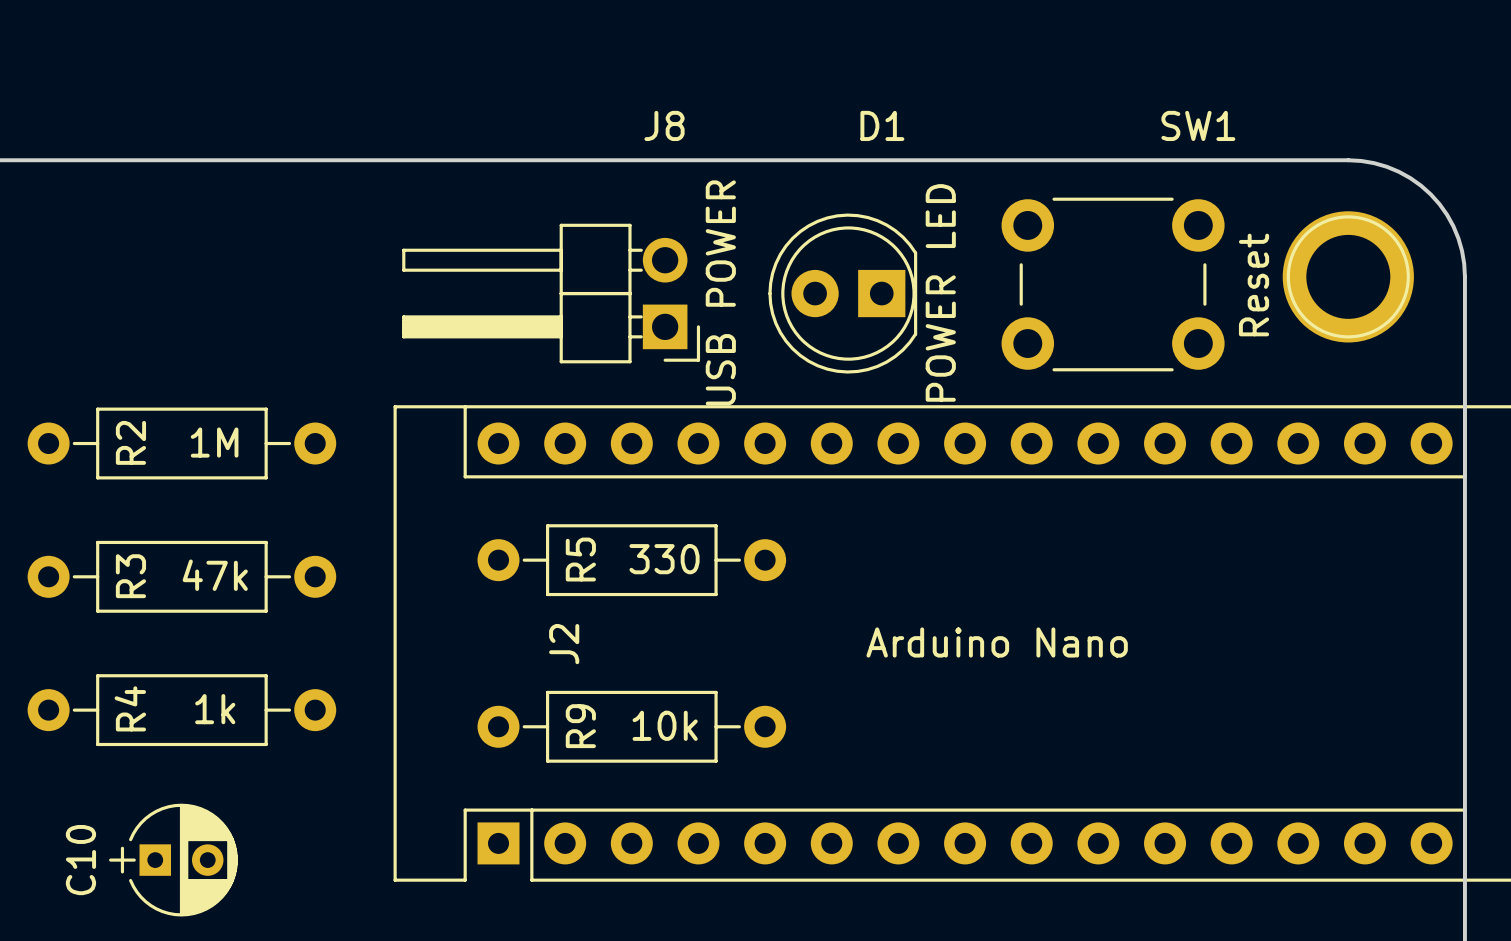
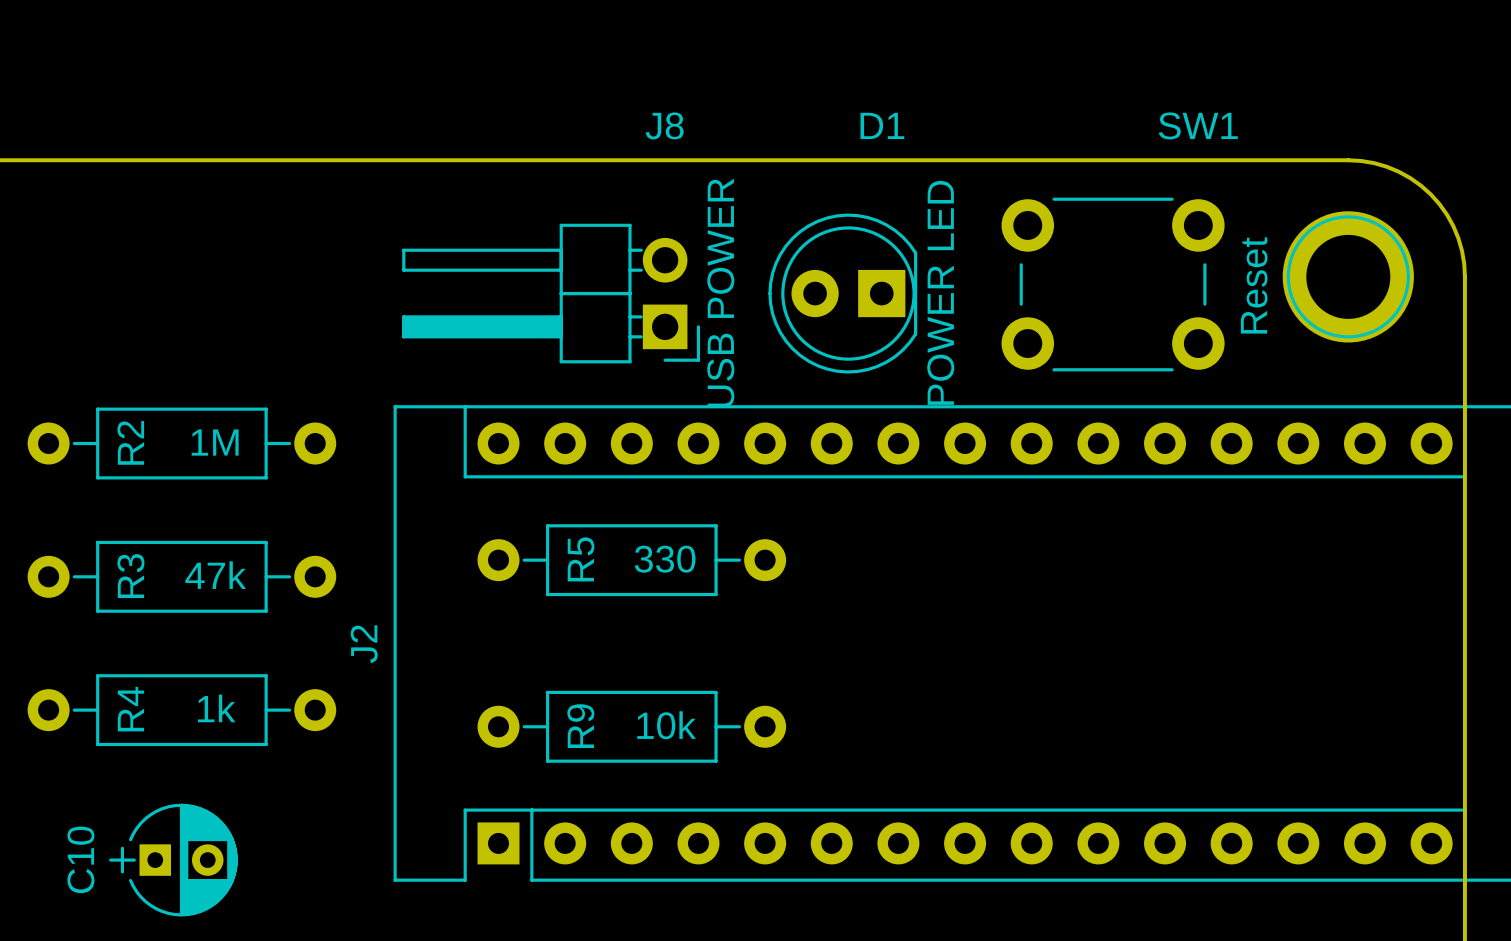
J2 value: Arduino Nano (997, 642) -> none
J2 name position: J2 (564, 644) -> J2 (364, 644)

